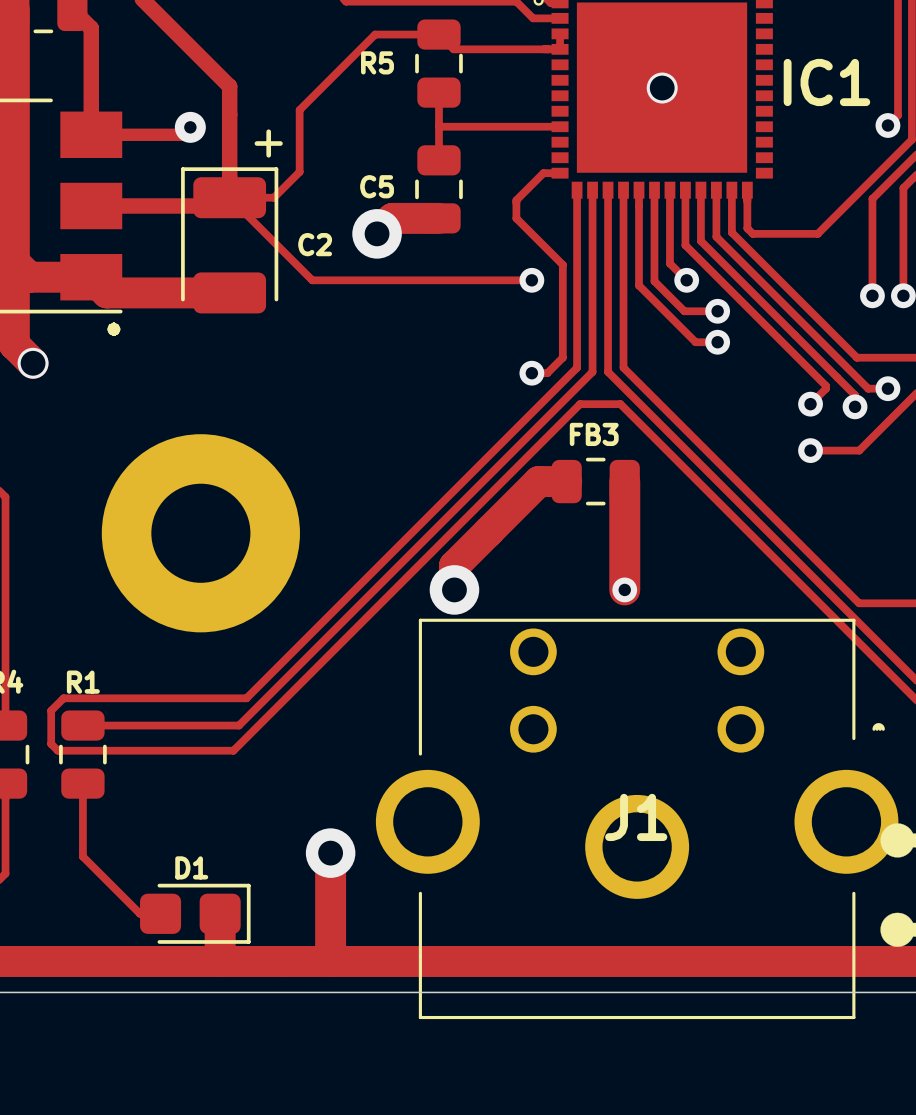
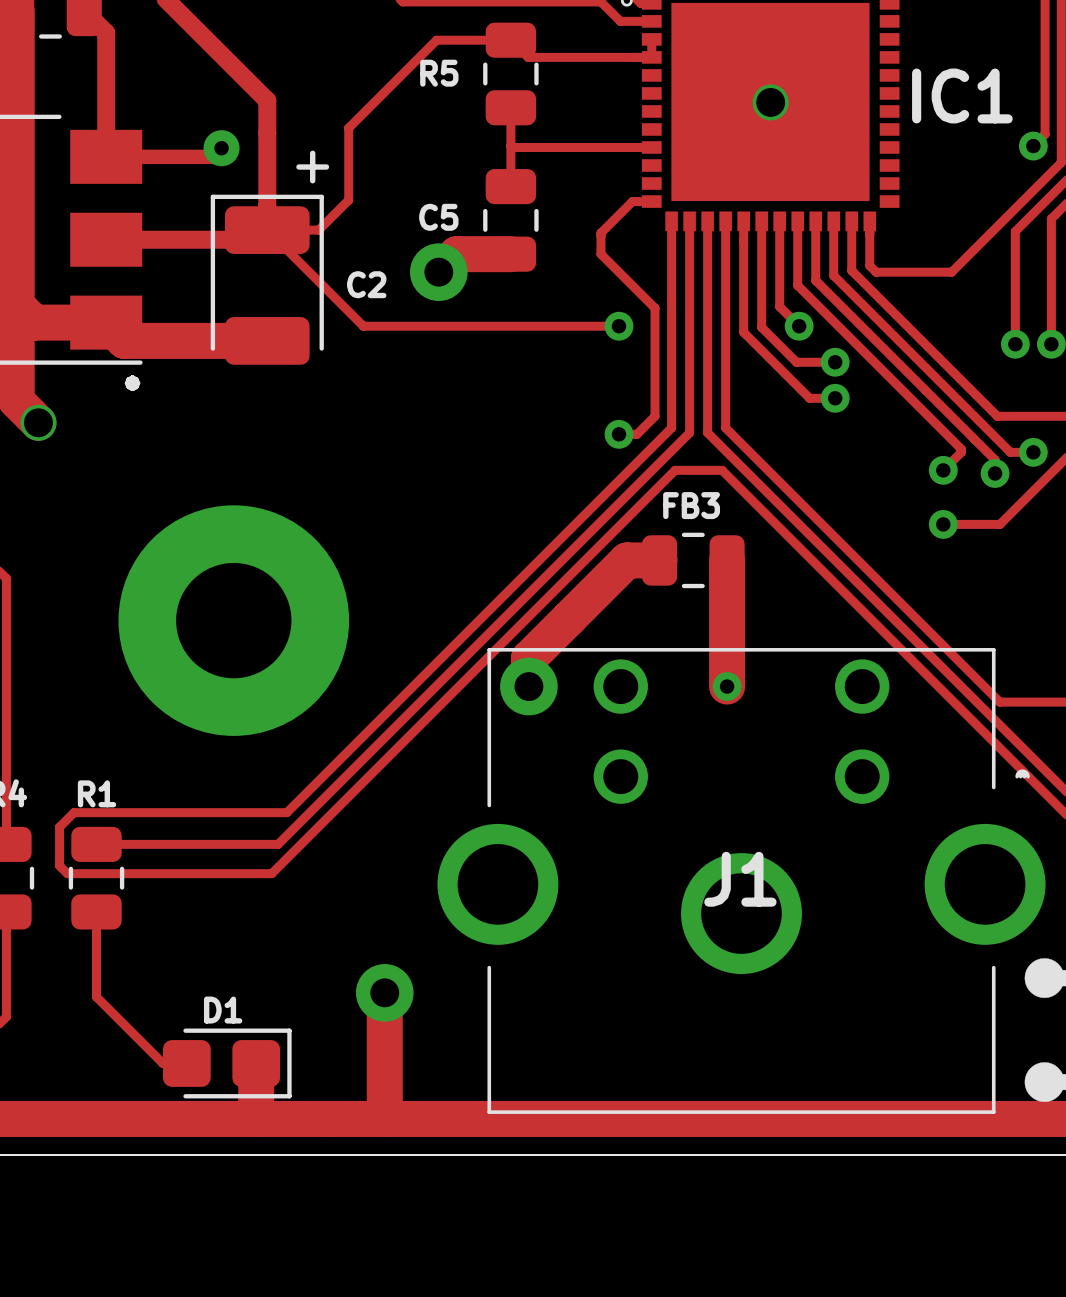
J1 position: (637, 818) -> (741, 880)

